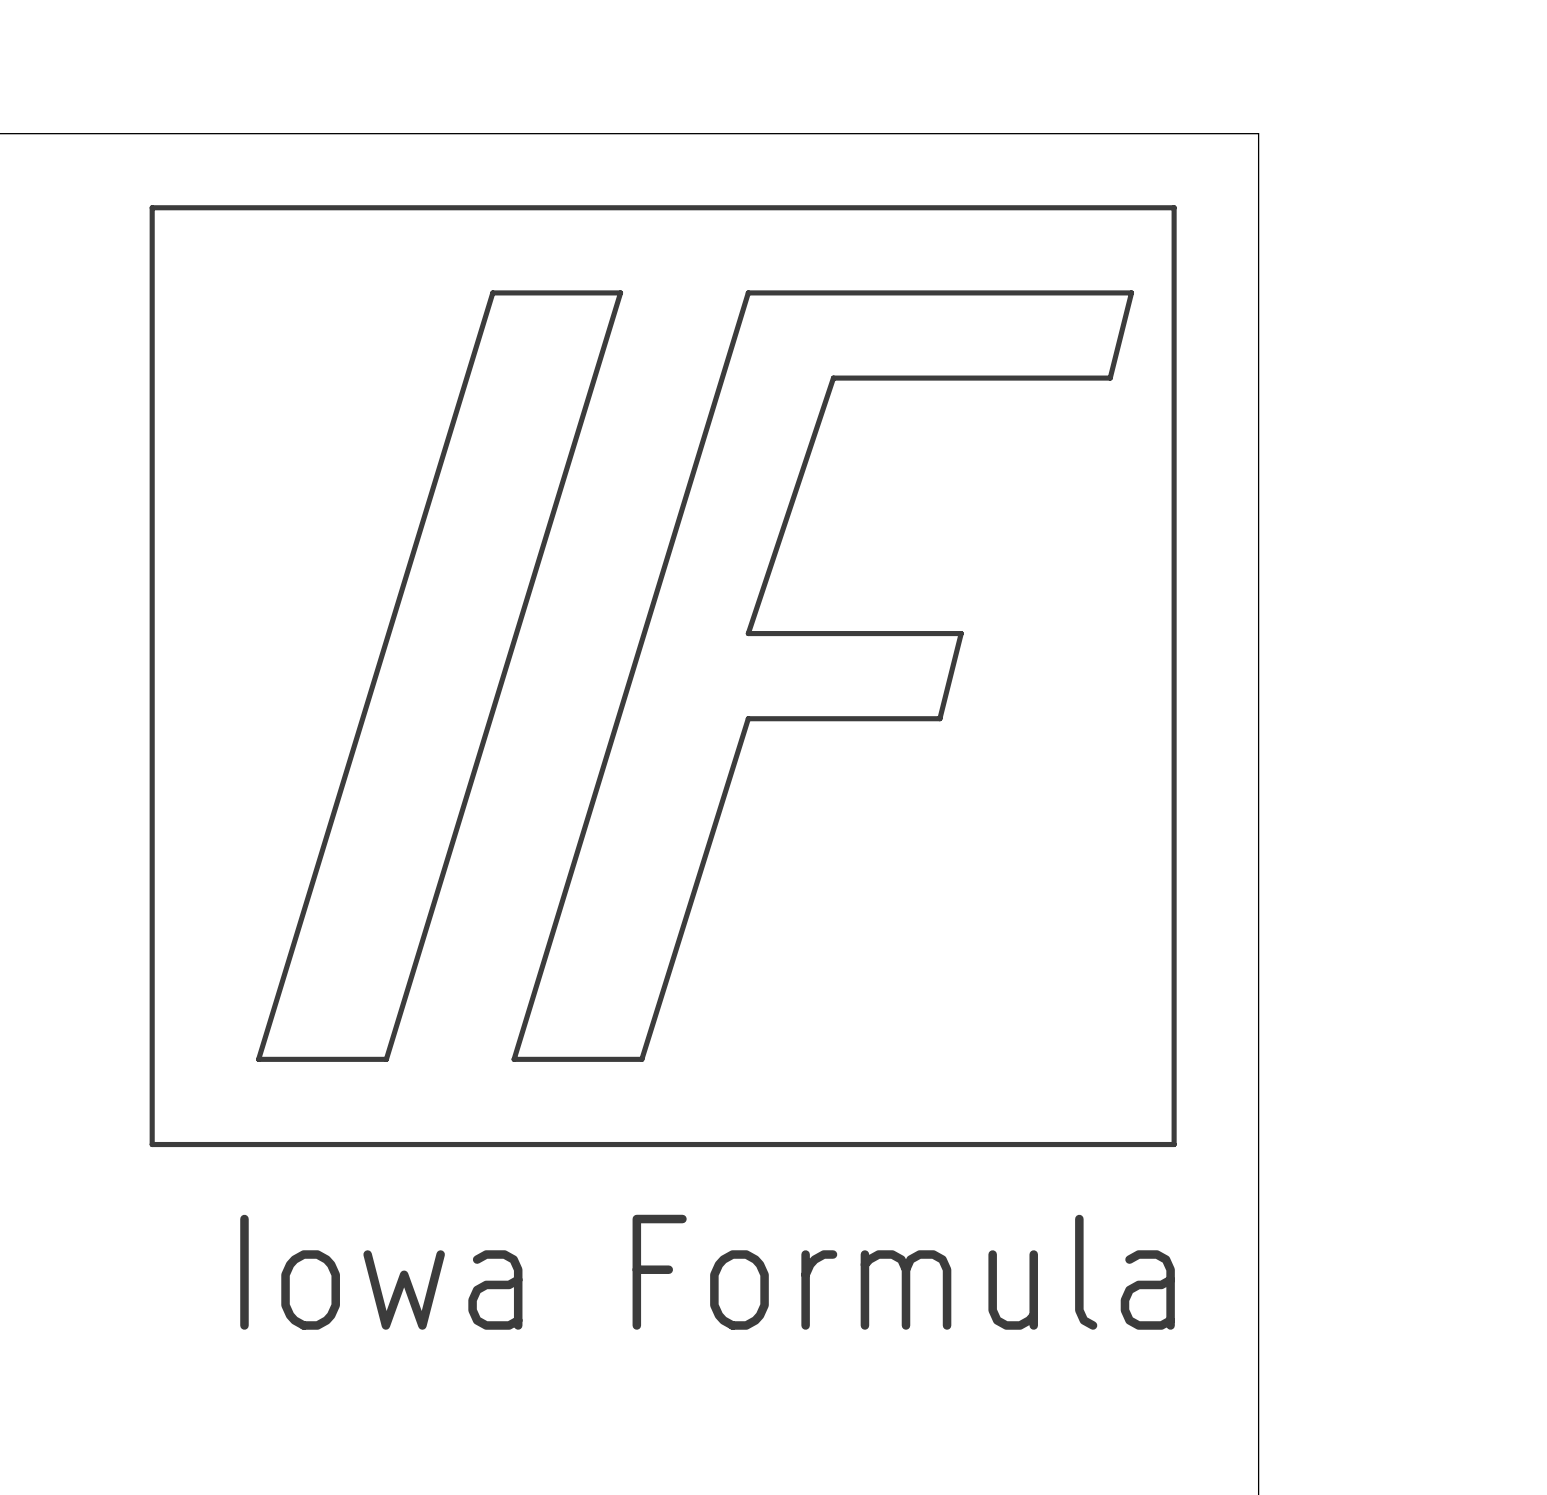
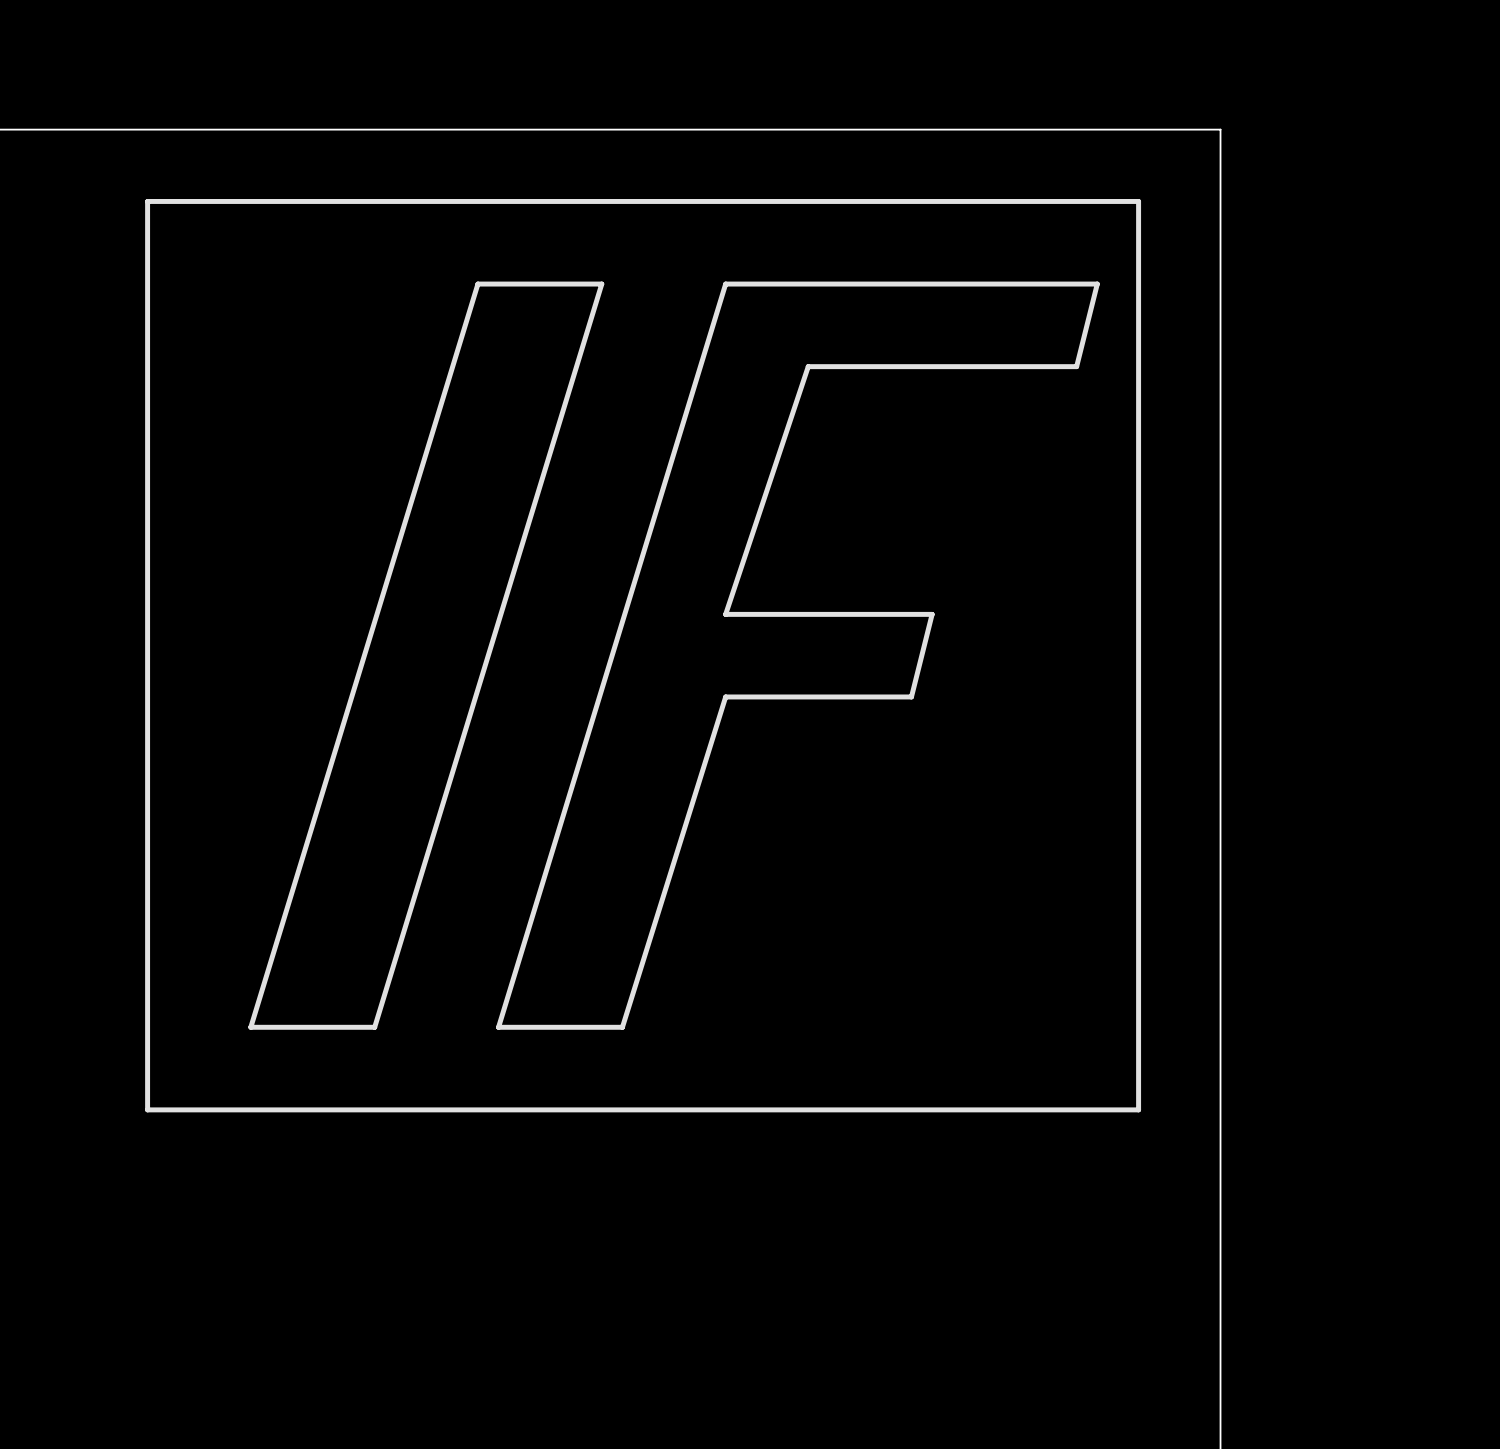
text: Iowa Formula (707, 1272) -> none

